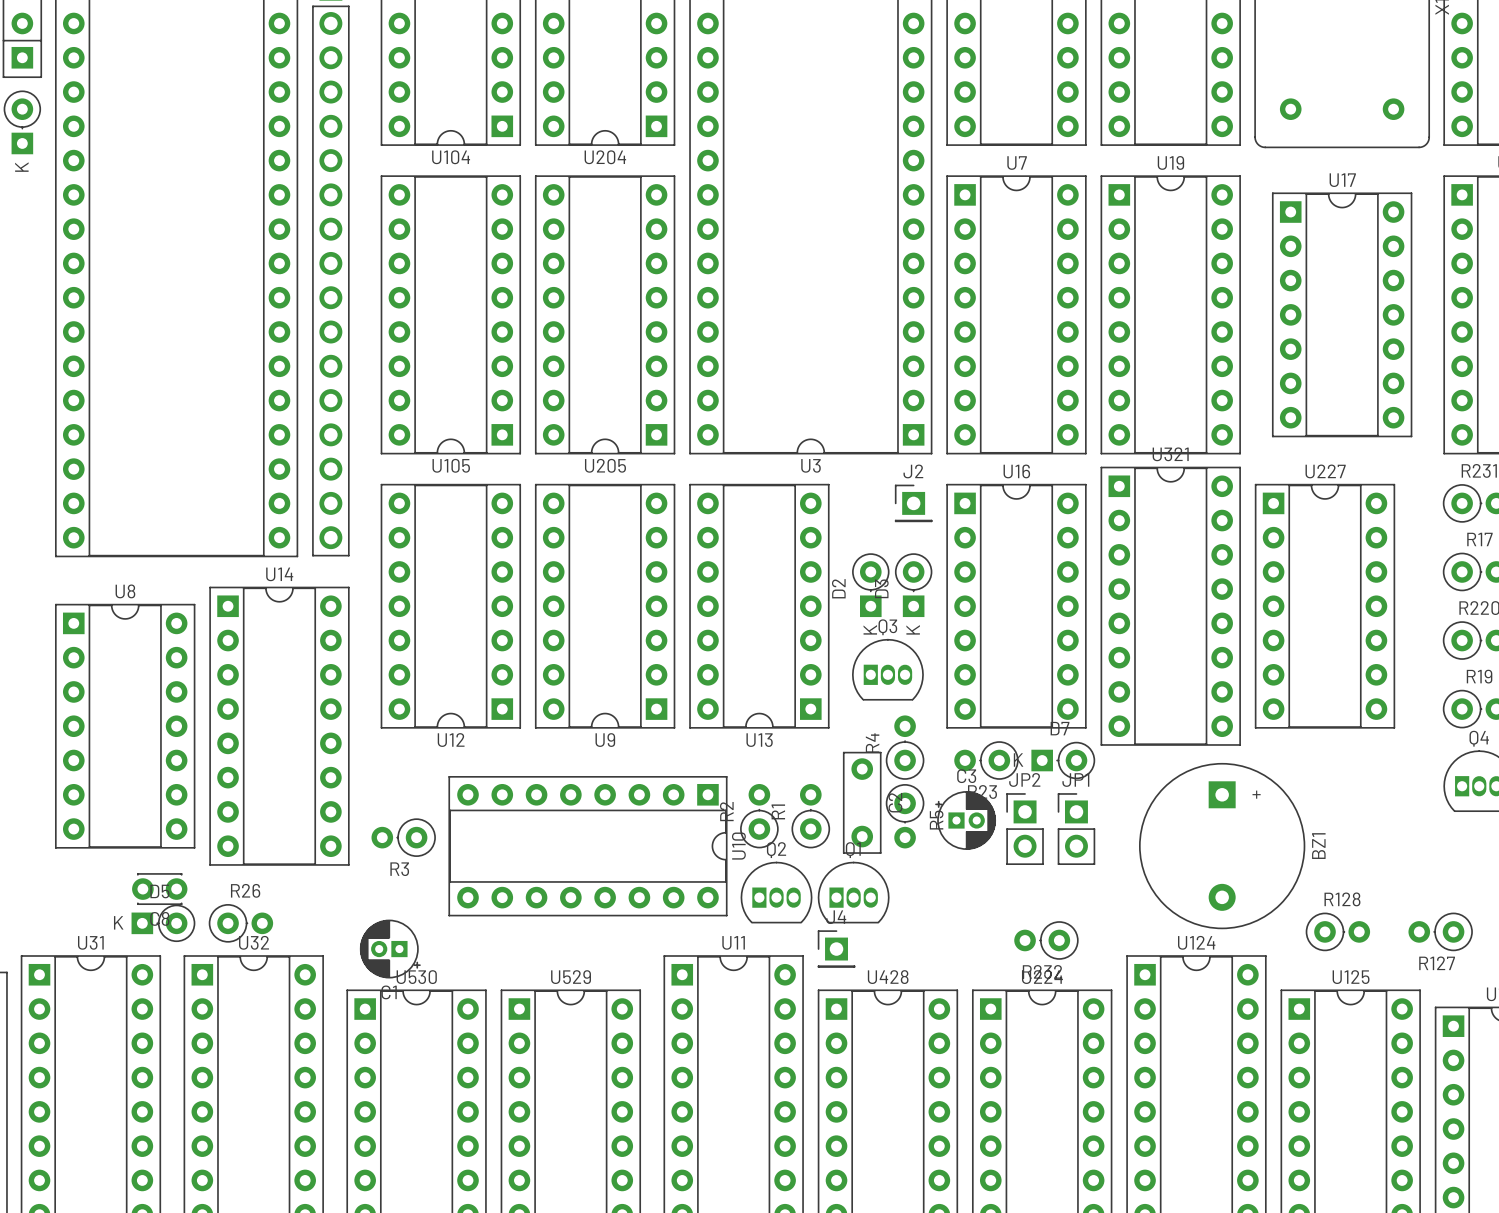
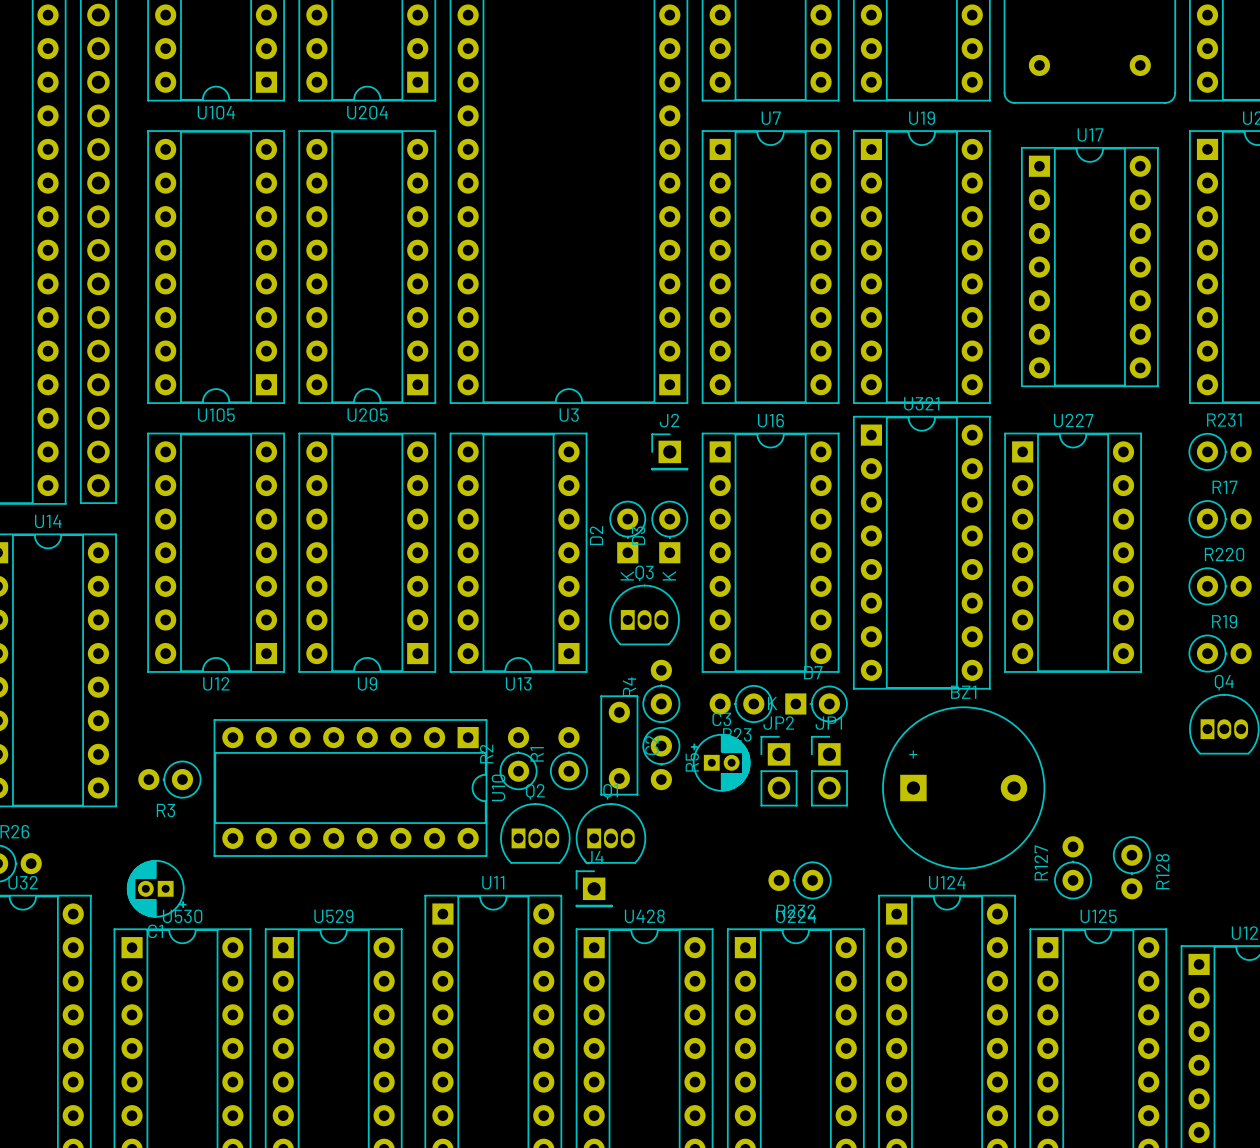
BZ1 rotation: 0° (1222, 846) -> 90° counterclockwise (963, 787)
R128 rotation: 0° (1337, 931) -> 90° clockwise (1131, 867)
R128 position: (1337, 931) -> (1131, 867)
R127 rotation: 0° (1440, 931) -> 90° clockwise (1073, 867)
R127 position: (1440, 931) -> (1073, 867)

